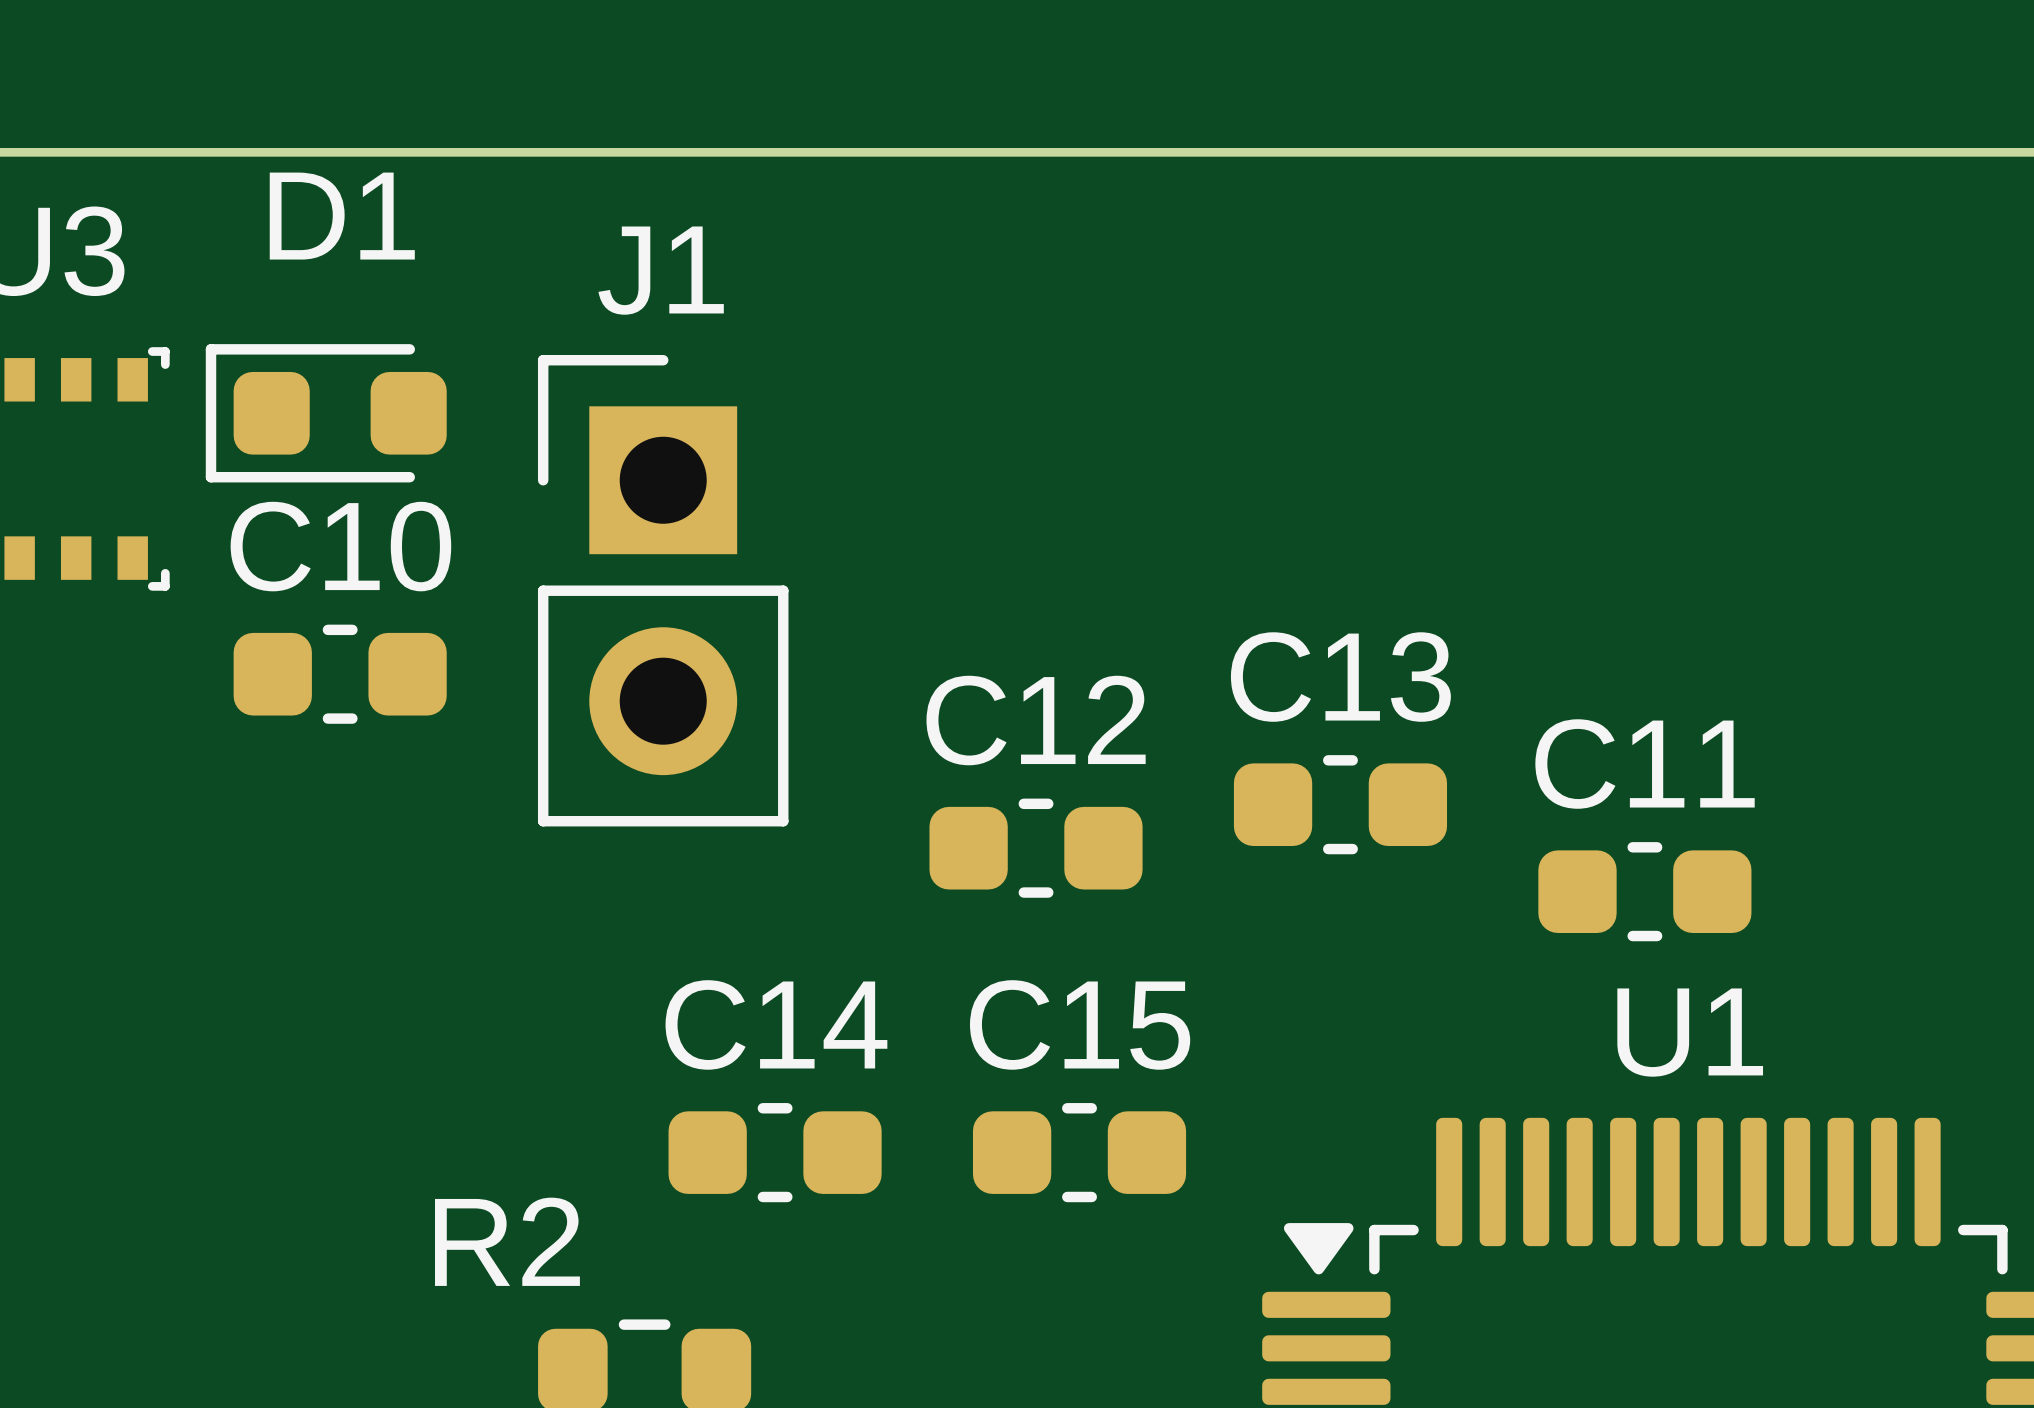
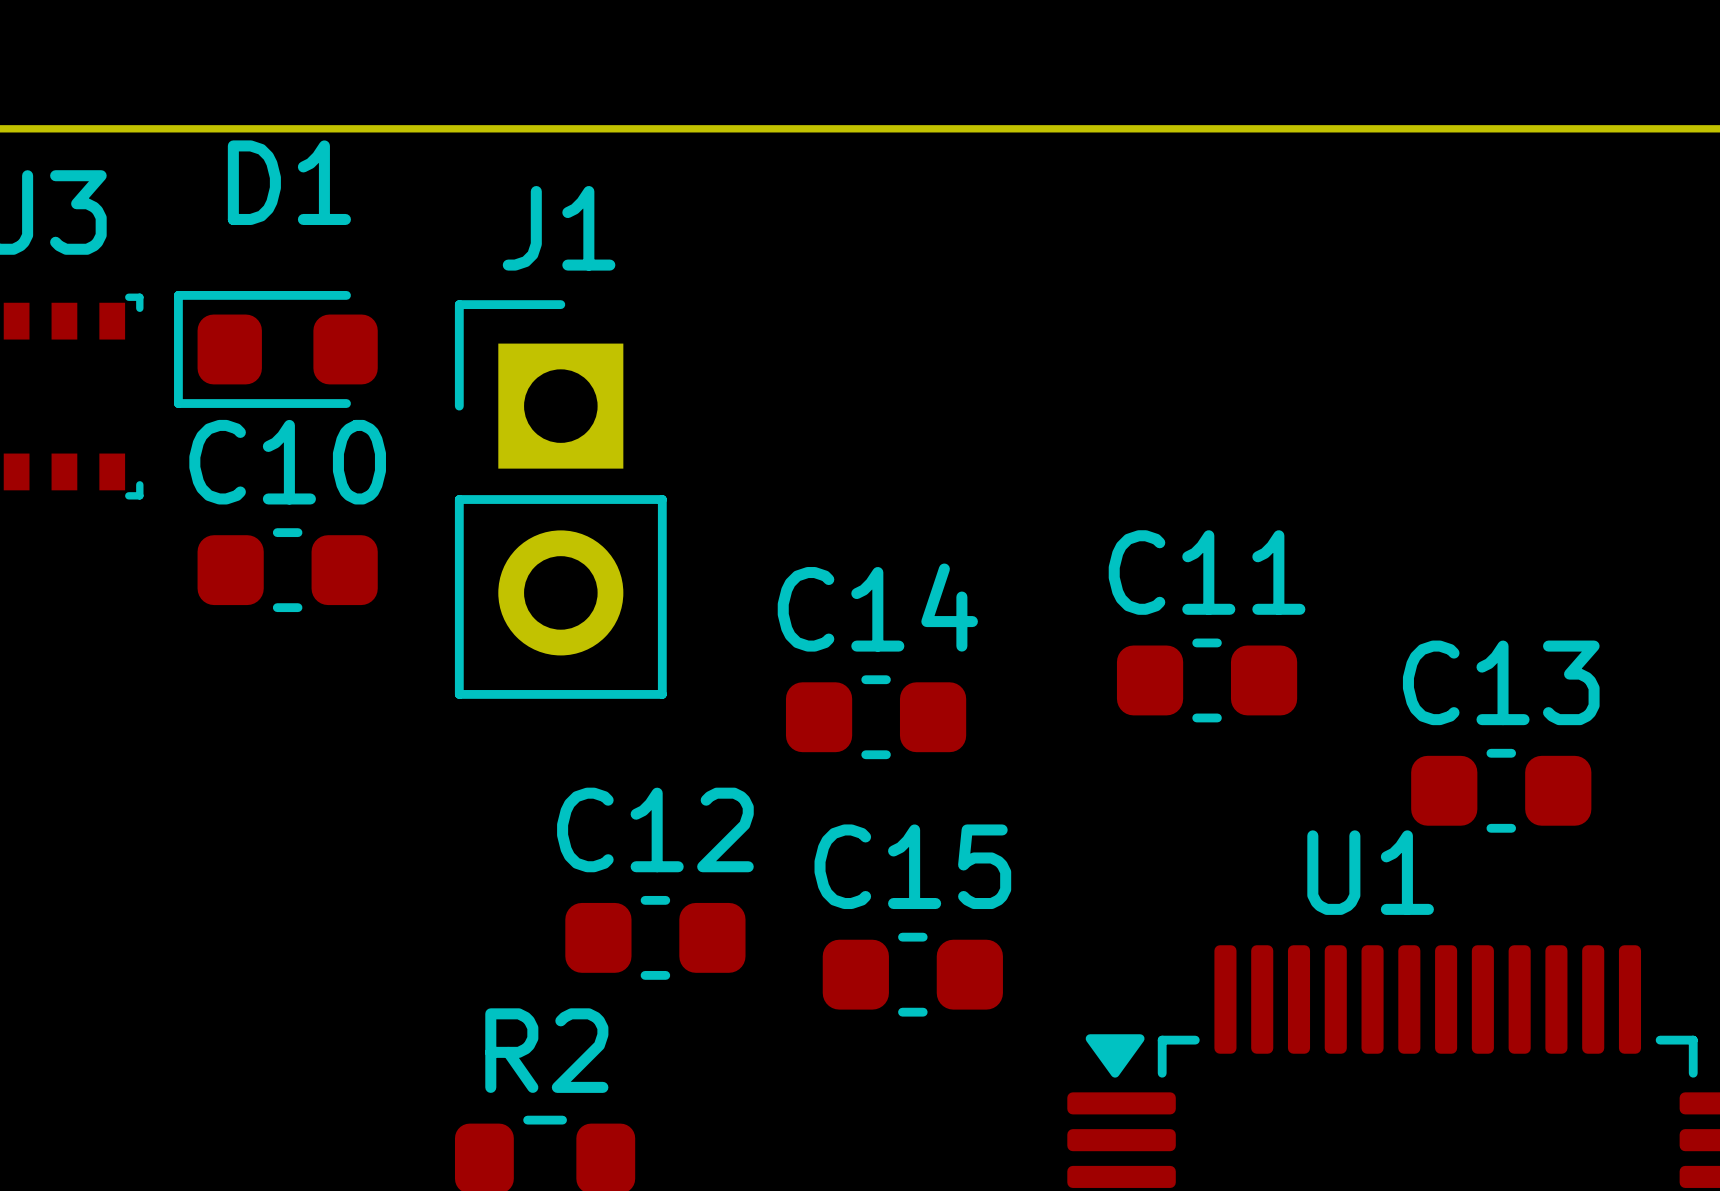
C12 name: C12 (1036, 720) -> C14 (877, 607)
C13 position: (1340, 804) -> (1501, 790)
C11 position: (1644, 891) -> (1207, 680)
C14 name: C14 (776, 1024) -> C12 (655, 829)
U1 name position: U1 (1690, 1032) -> U1 (1370, 872)
C14 position: (775, 1152) -> (655, 937)
R2 name position: R2 (507, 1241) -> R2 (546, 1050)

